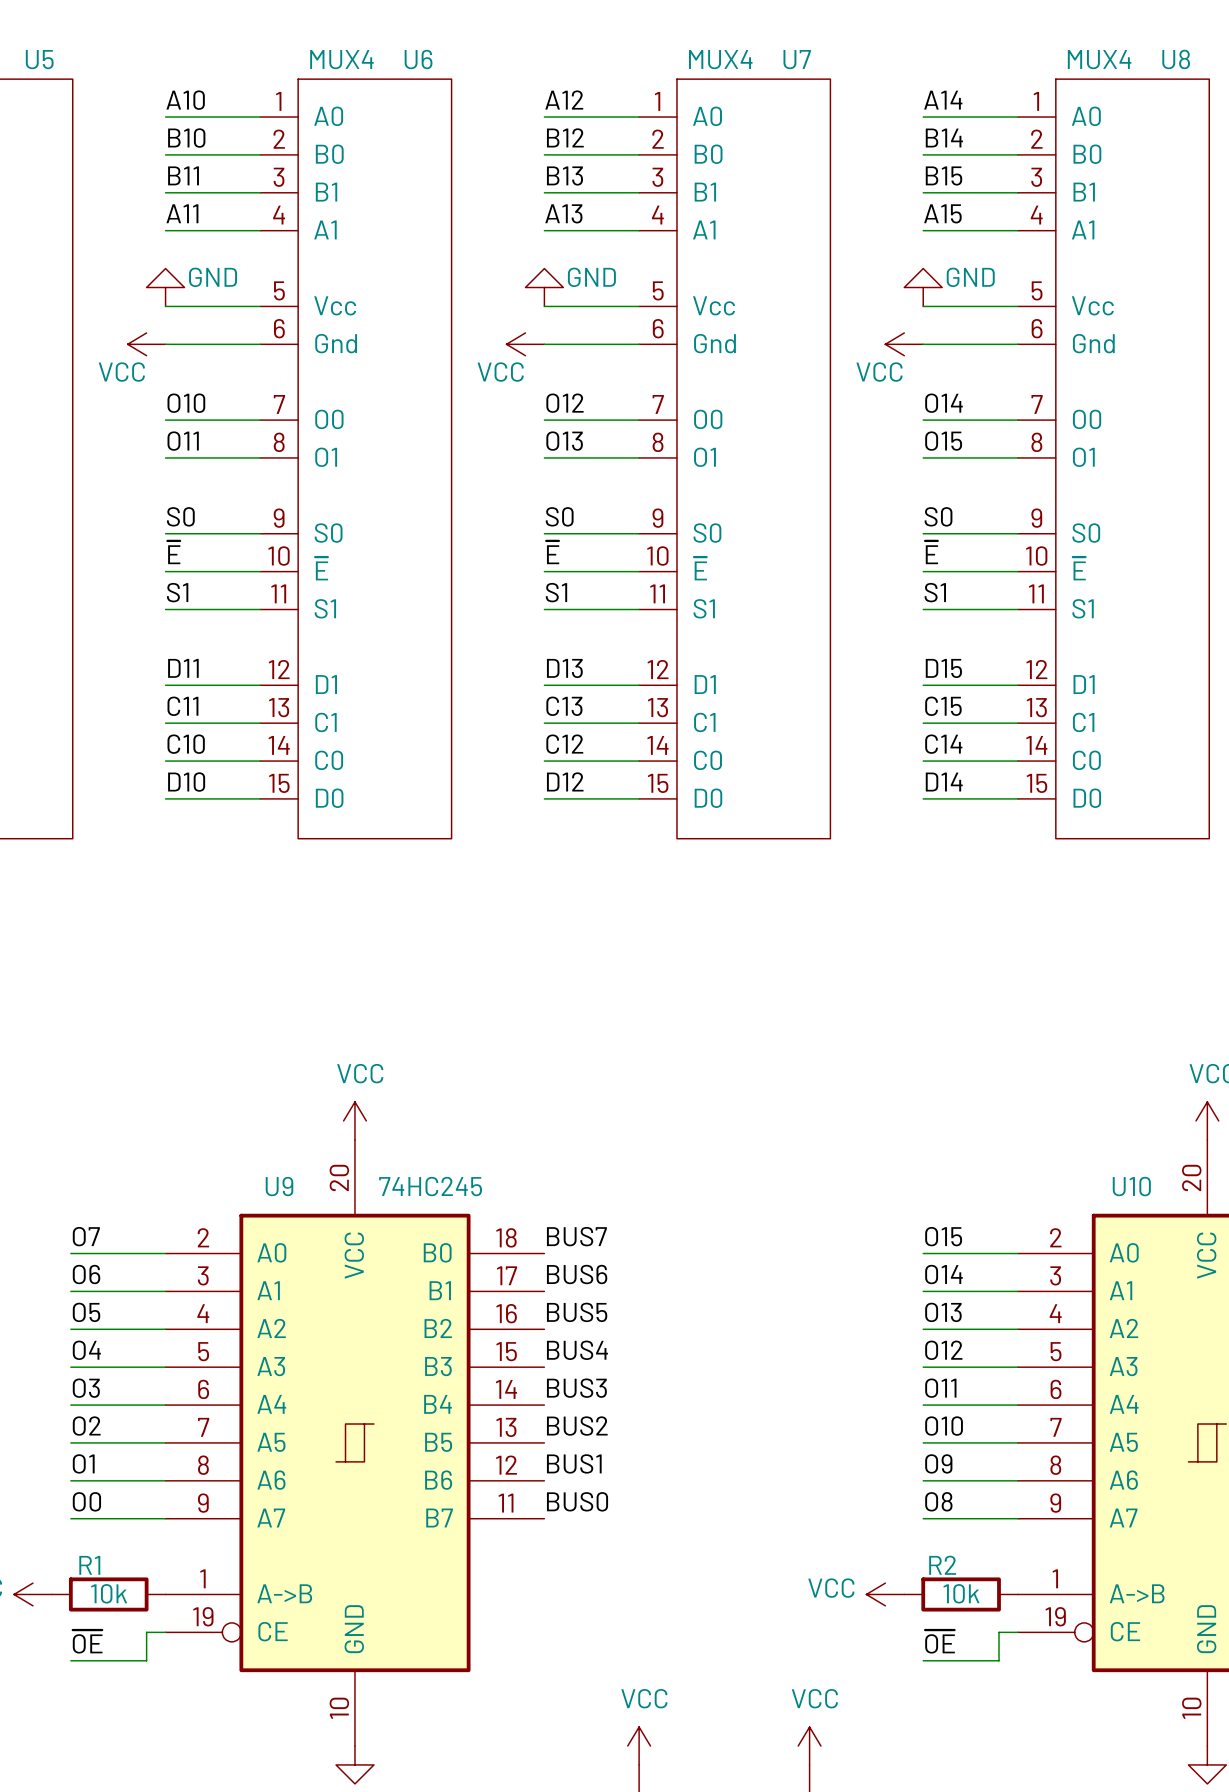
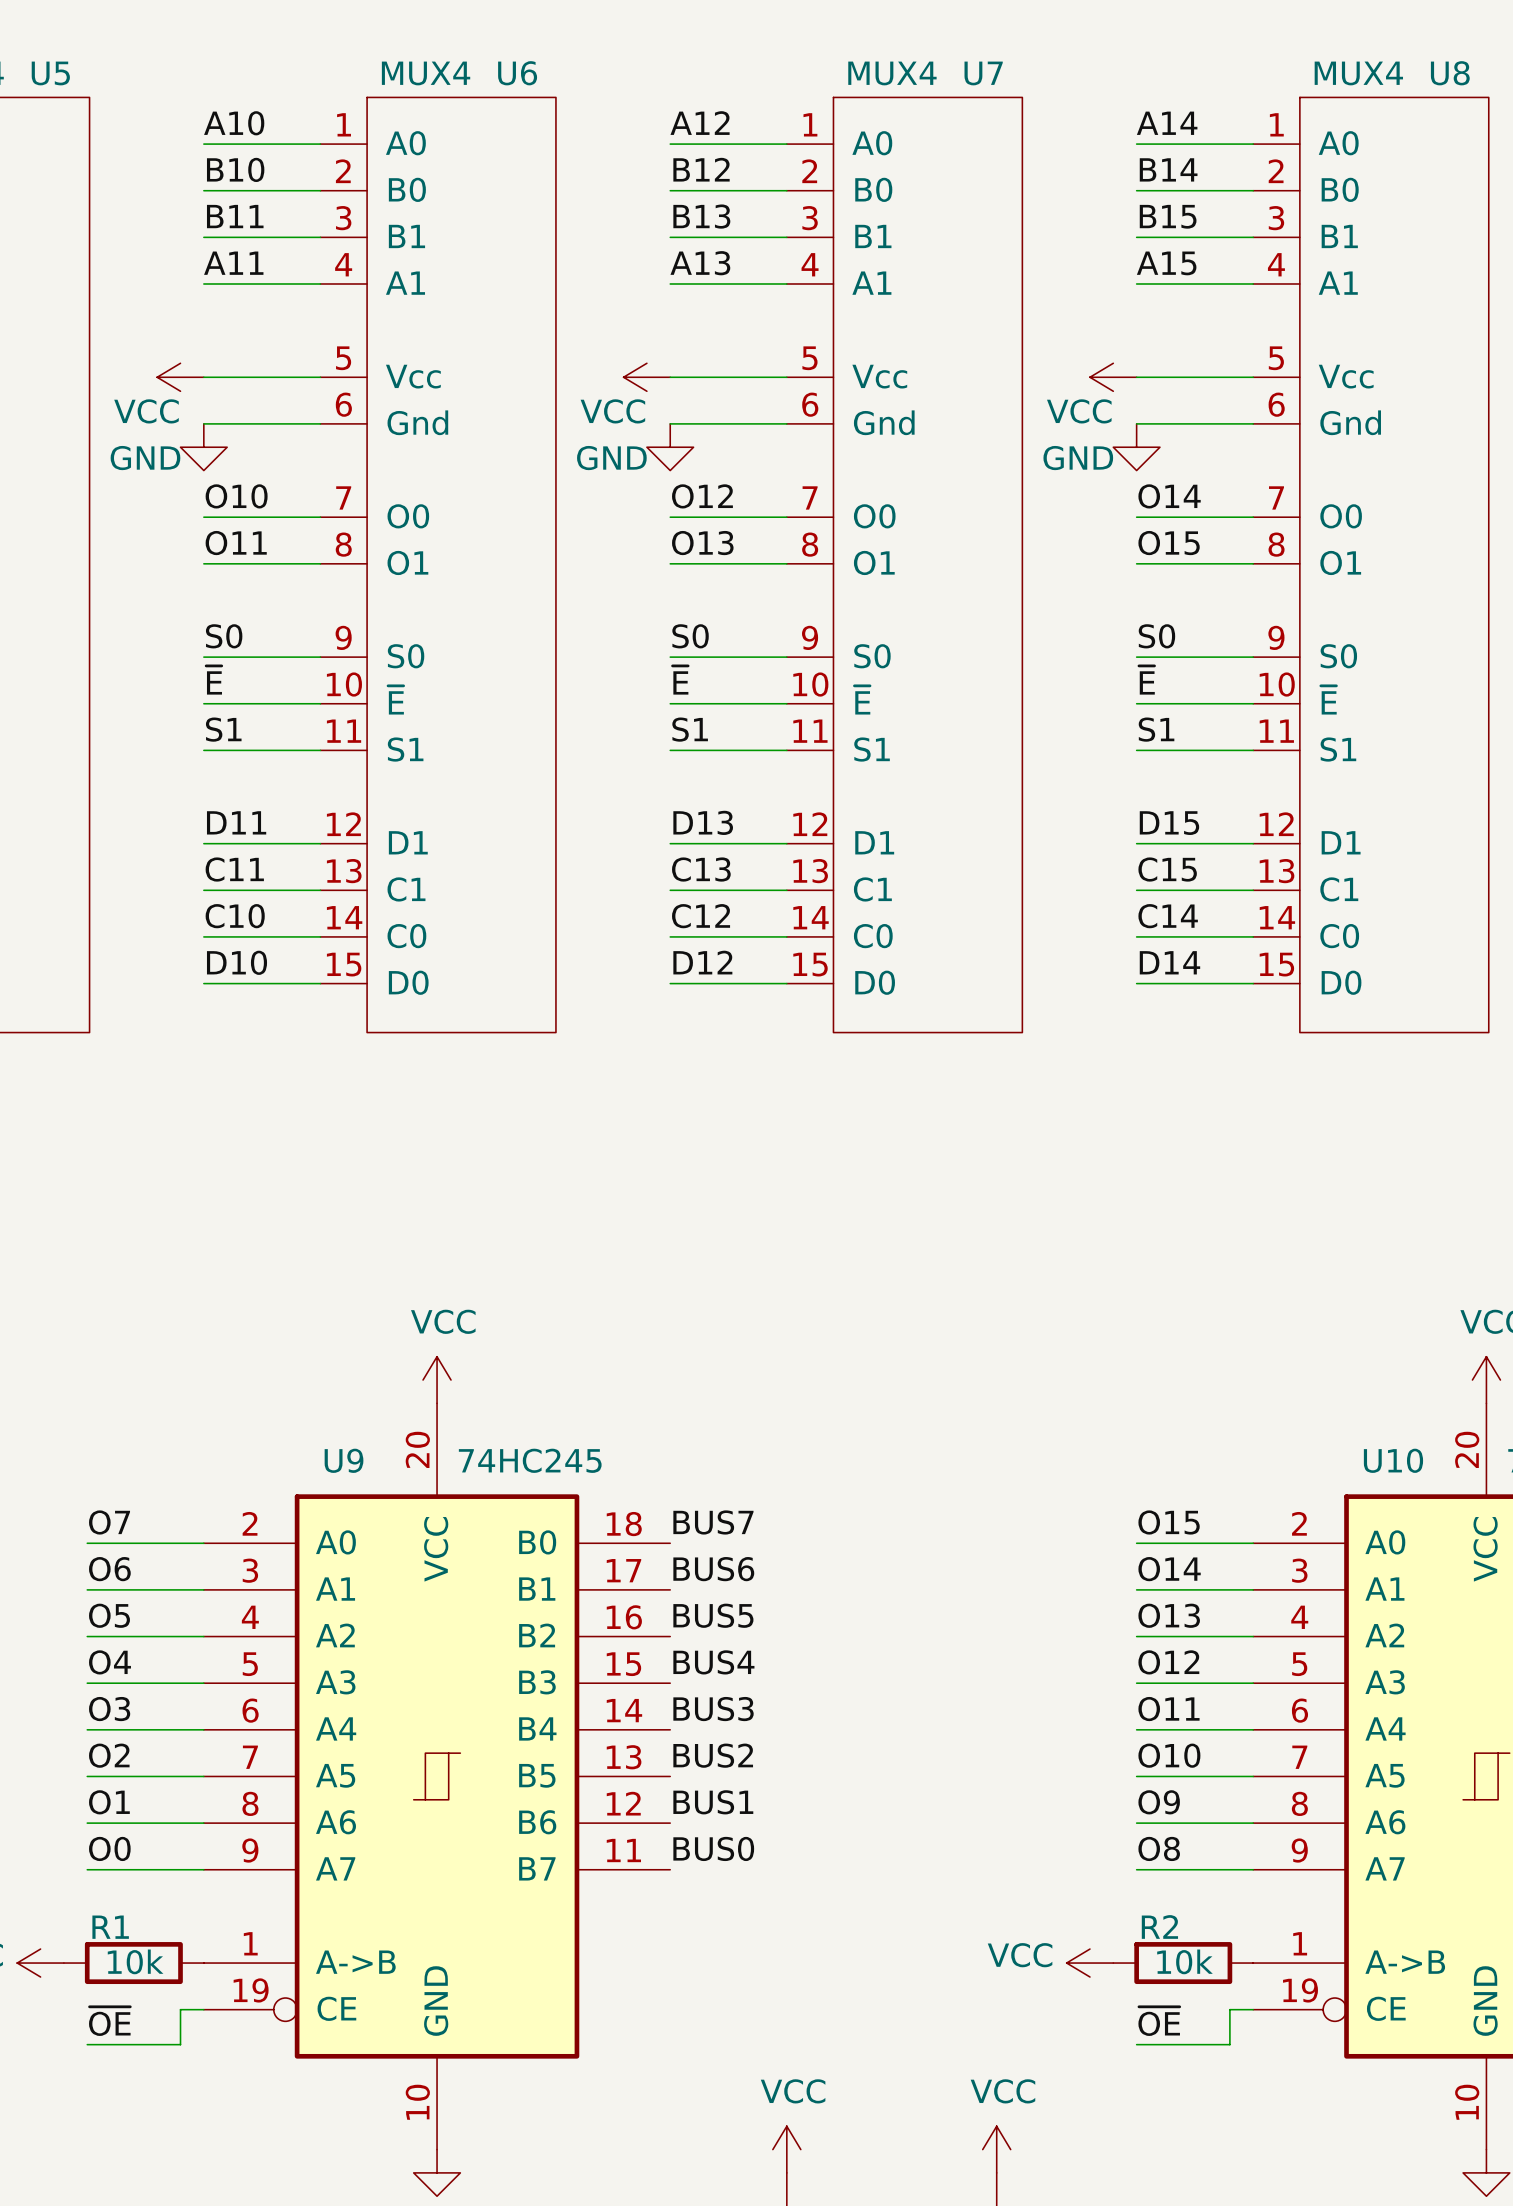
power symbol rotation: 0° (165, 287) -> 180° (203, 447)
power symbol position: GND (165, 287) -> GND (203, 447)
power symbol rotation: 0° (544, 287) -> 180° (670, 447)
power symbol position: GND (544, 287) -> GND (670, 447)
power symbol rotation: 0° (923, 287) -> 180° (1136, 447)
power symbol position: GND (923, 287) -> GND (1136, 447)
power symbol position: VCC (146, 344) -> VCC (180, 377)
power symbol position: VCC (525, 344) -> VCC (646, 377)
power symbol position: VCC (904, 344) -> VCC (1113, 377)

